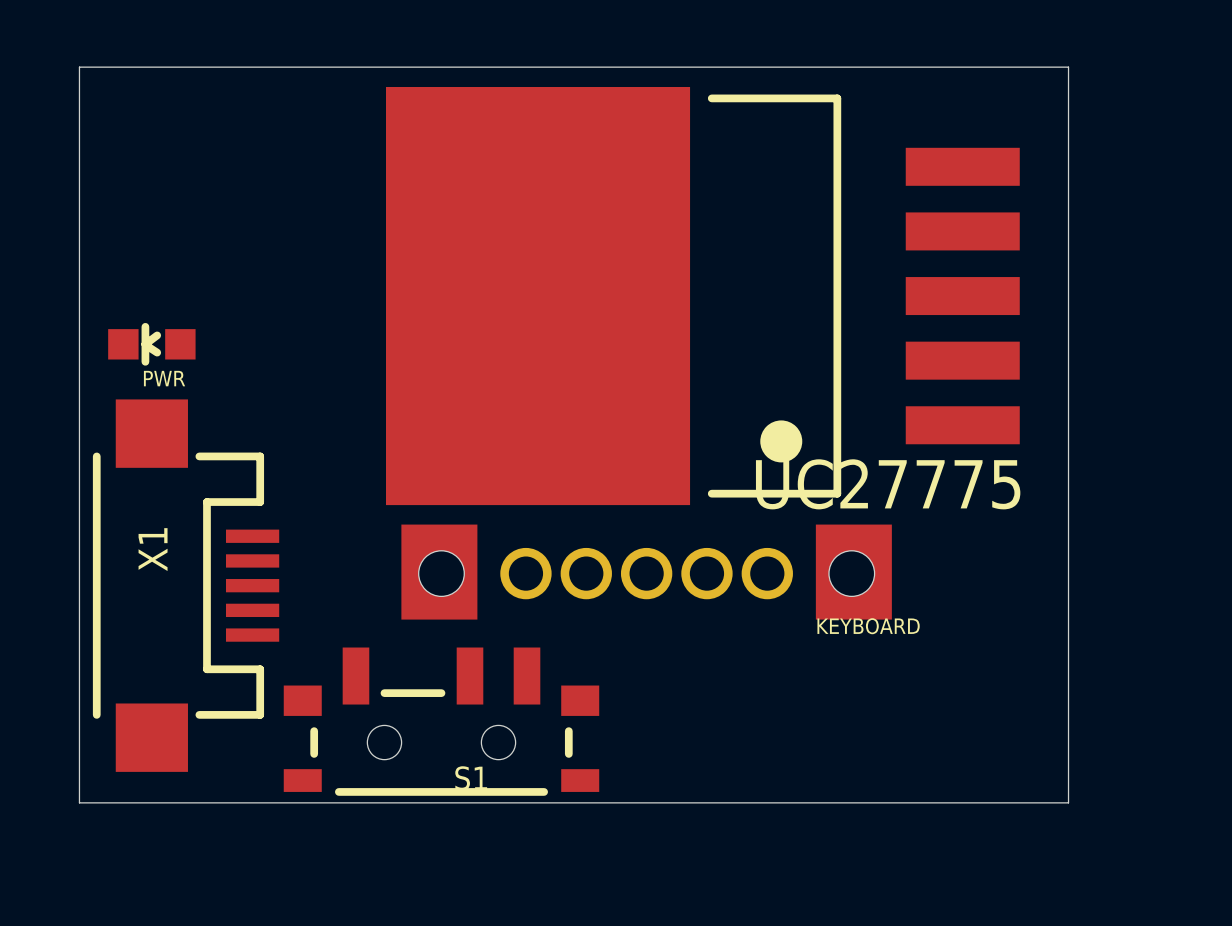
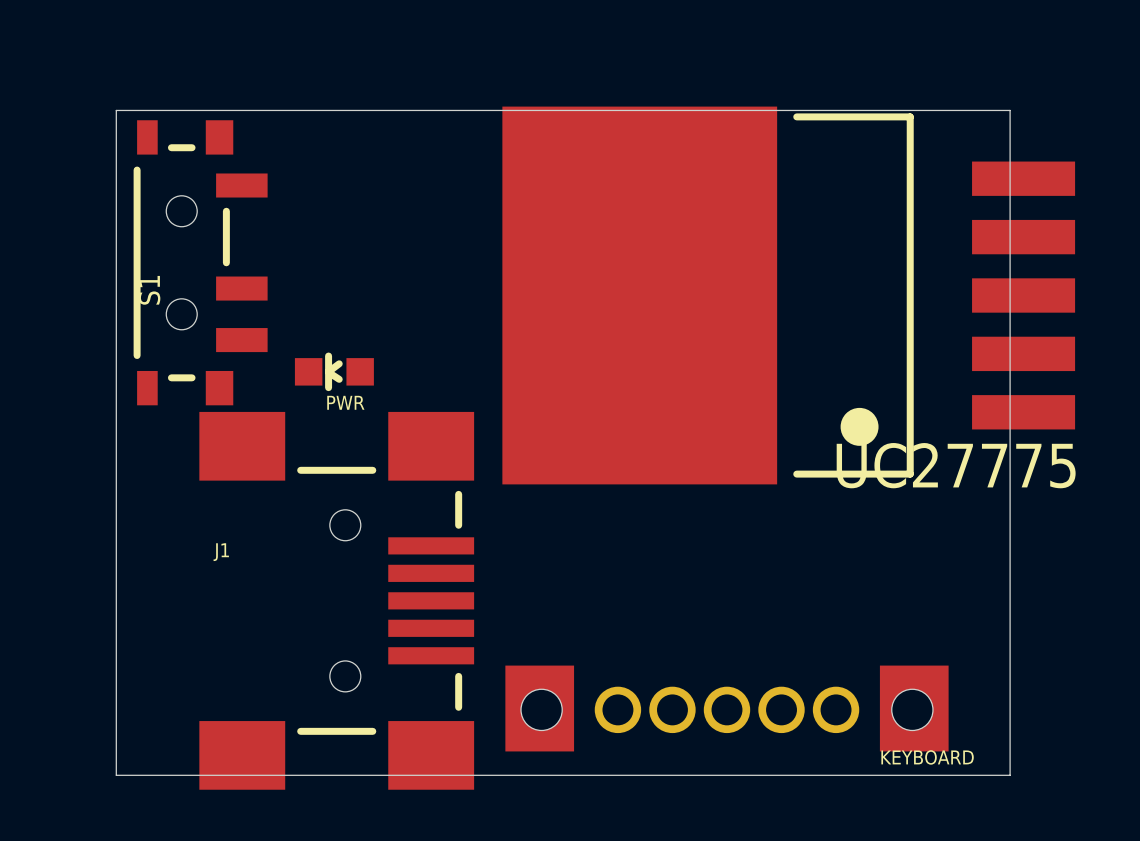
UC27775 position: (702, 296) -> (788, 295)
PWR position: (151, 344) -> (334, 371)
KEYBOARD position: (646, 572) -> (726, 708)
X1: (186, 585) -> none
J1: none -> (336, 600)
S1 rotation: 0° (441, 721) -> 90° clockwise (200, 262)
S1 position: (441, 721) -> (200, 262)

